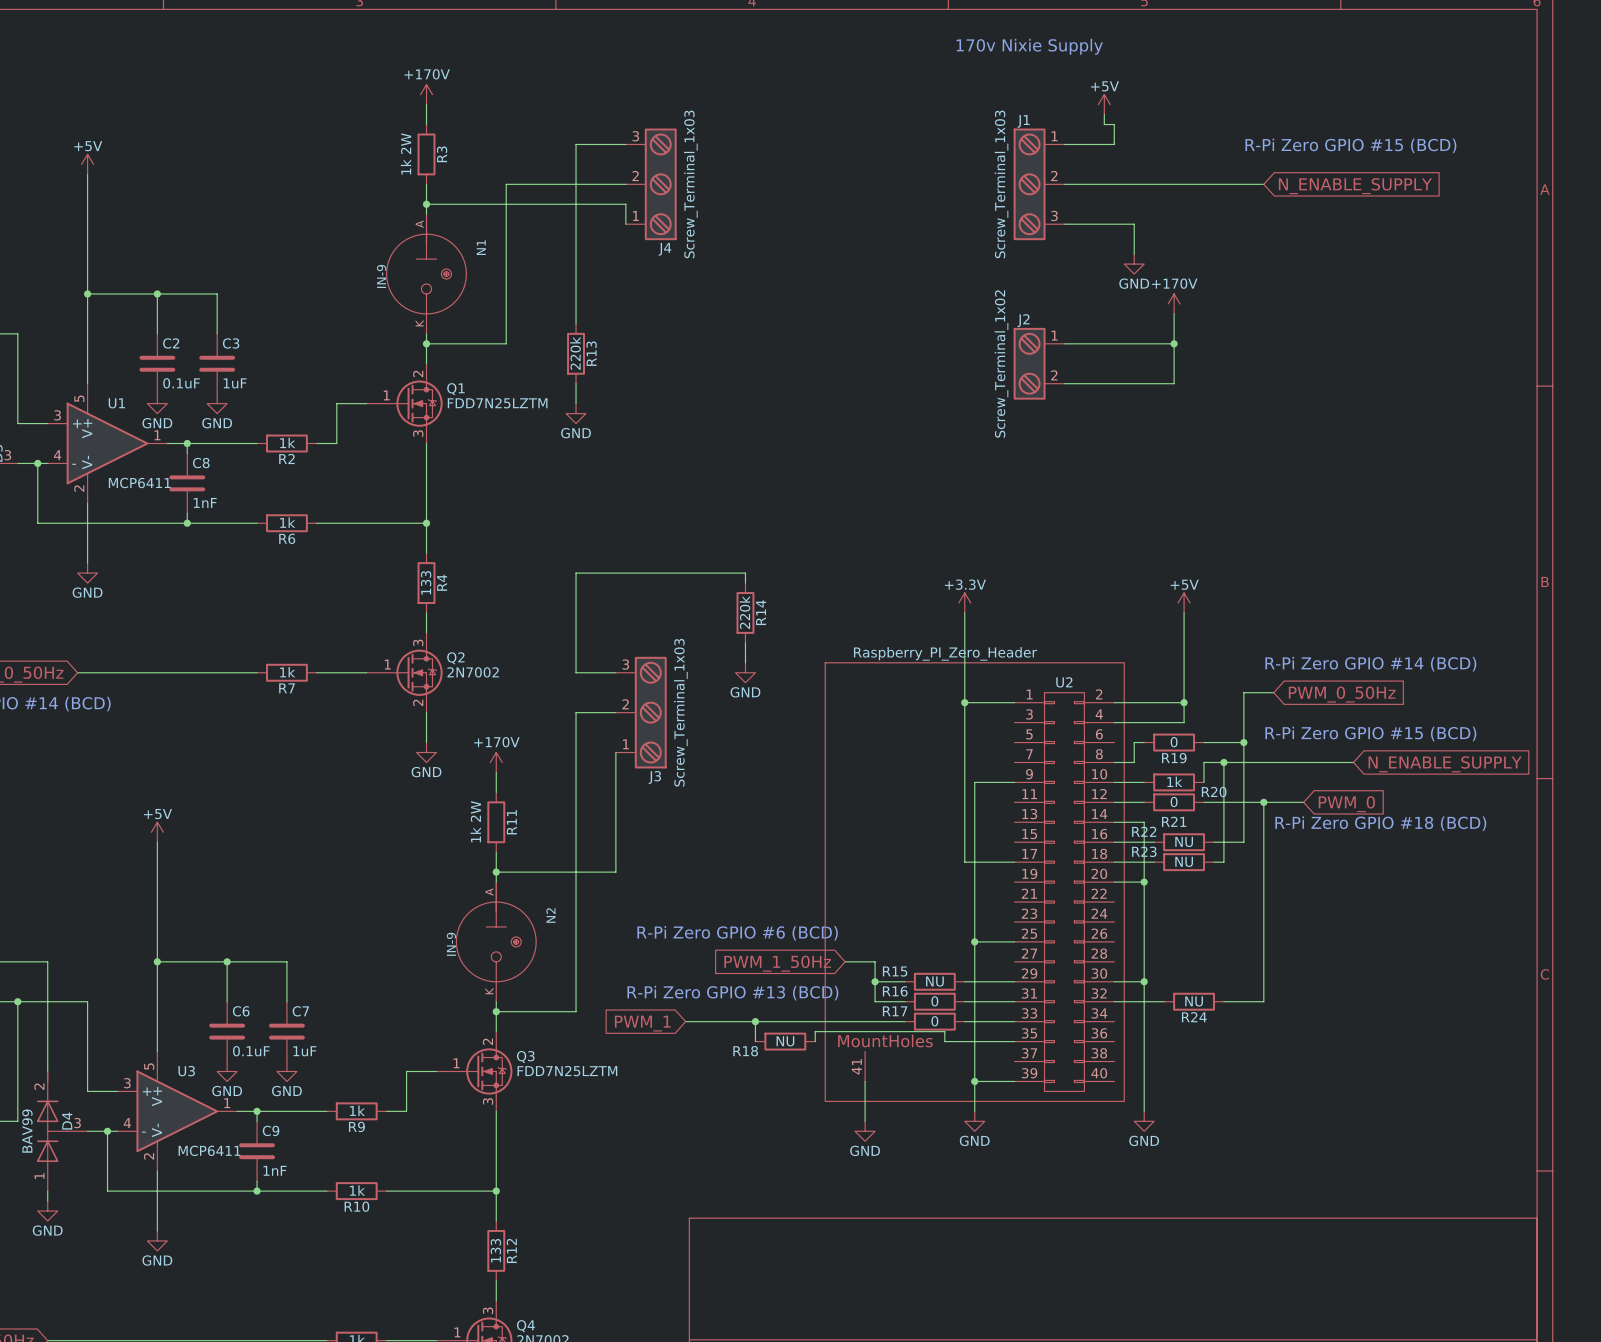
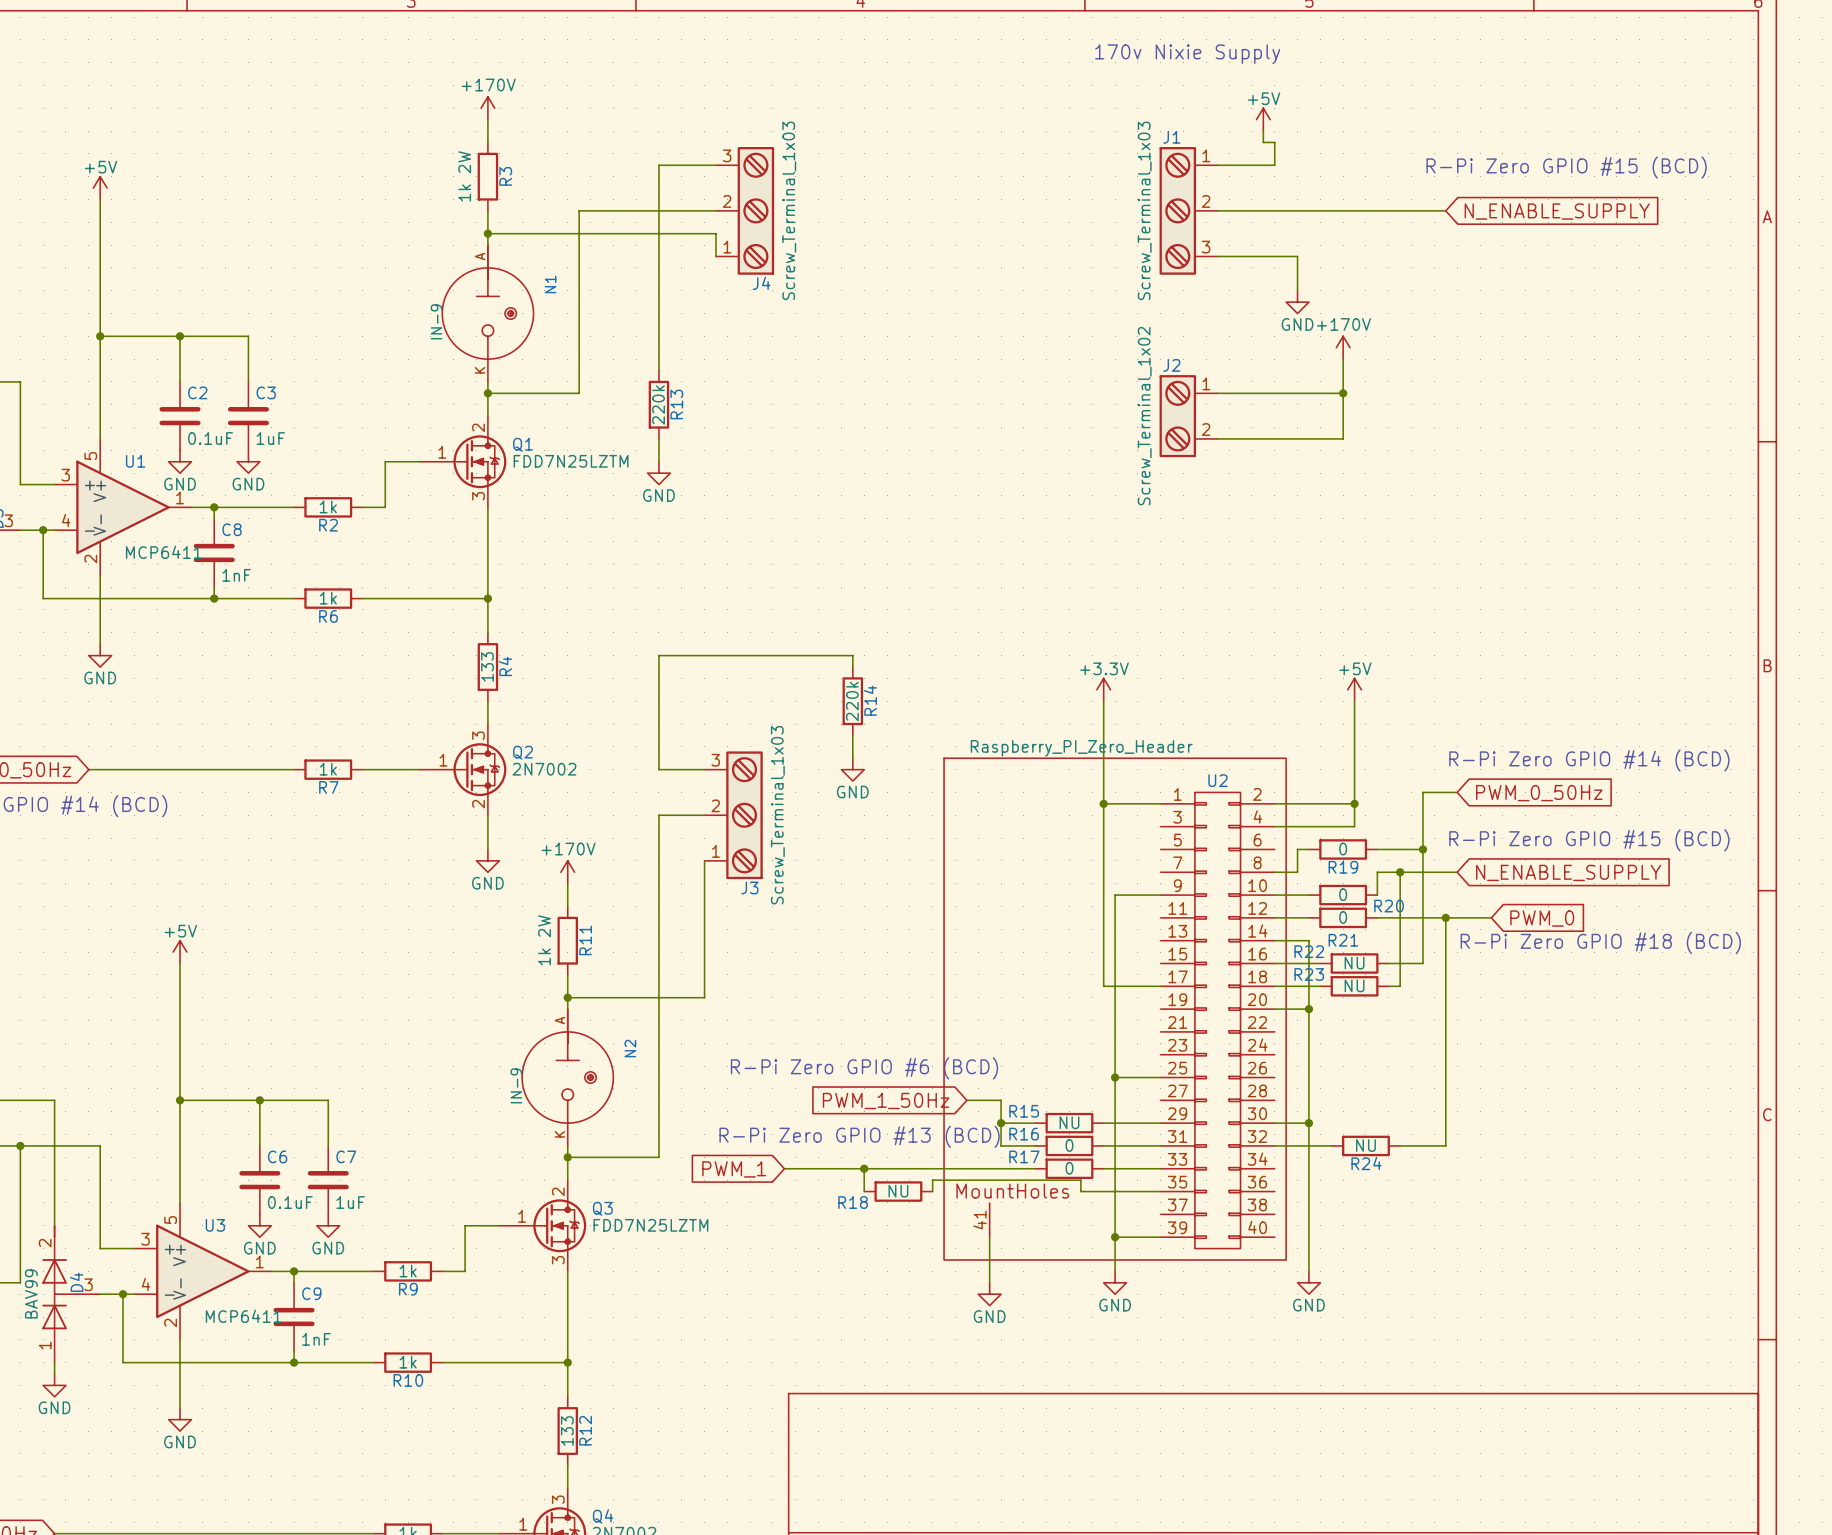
wire: (1273, 762) (1353, 762) -> none
global label position: N_ENABLE_SUPPLY (1445, 764) -> N_ENABLE_SUPPLY (1568, 872)
R20 value: 1k (1174, 781) -> 0 (1343, 894)

